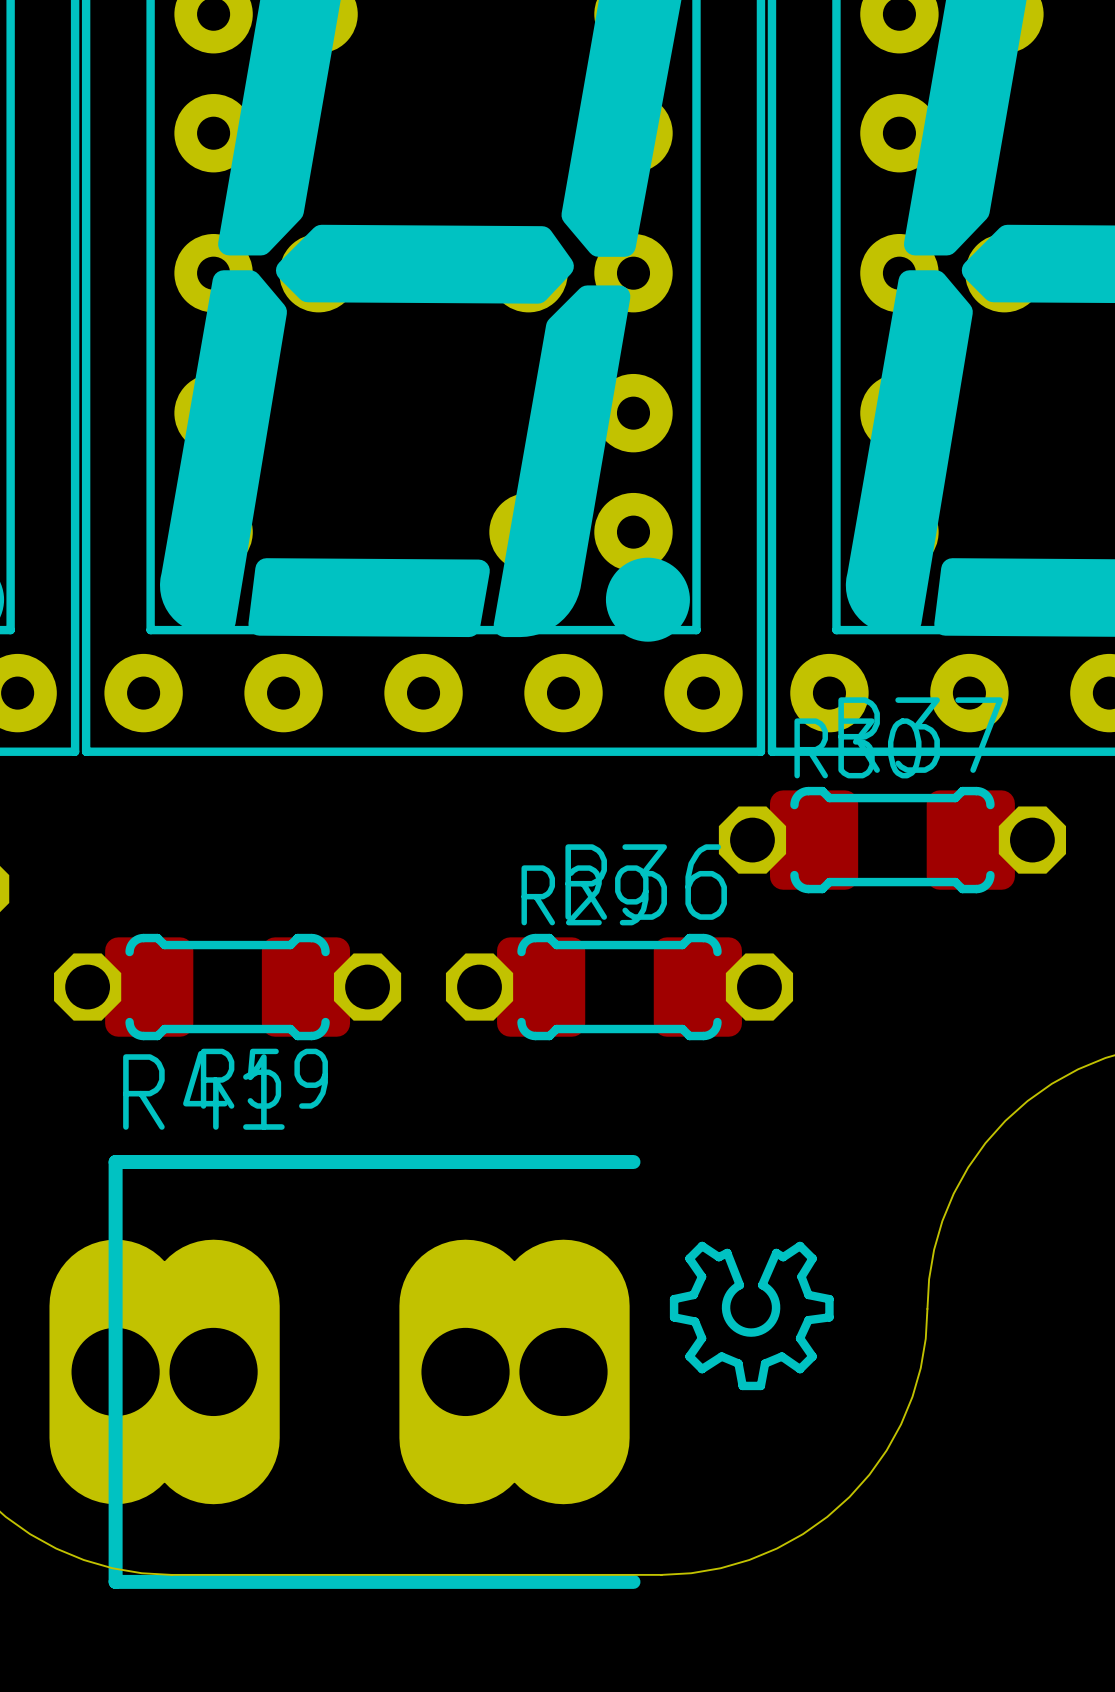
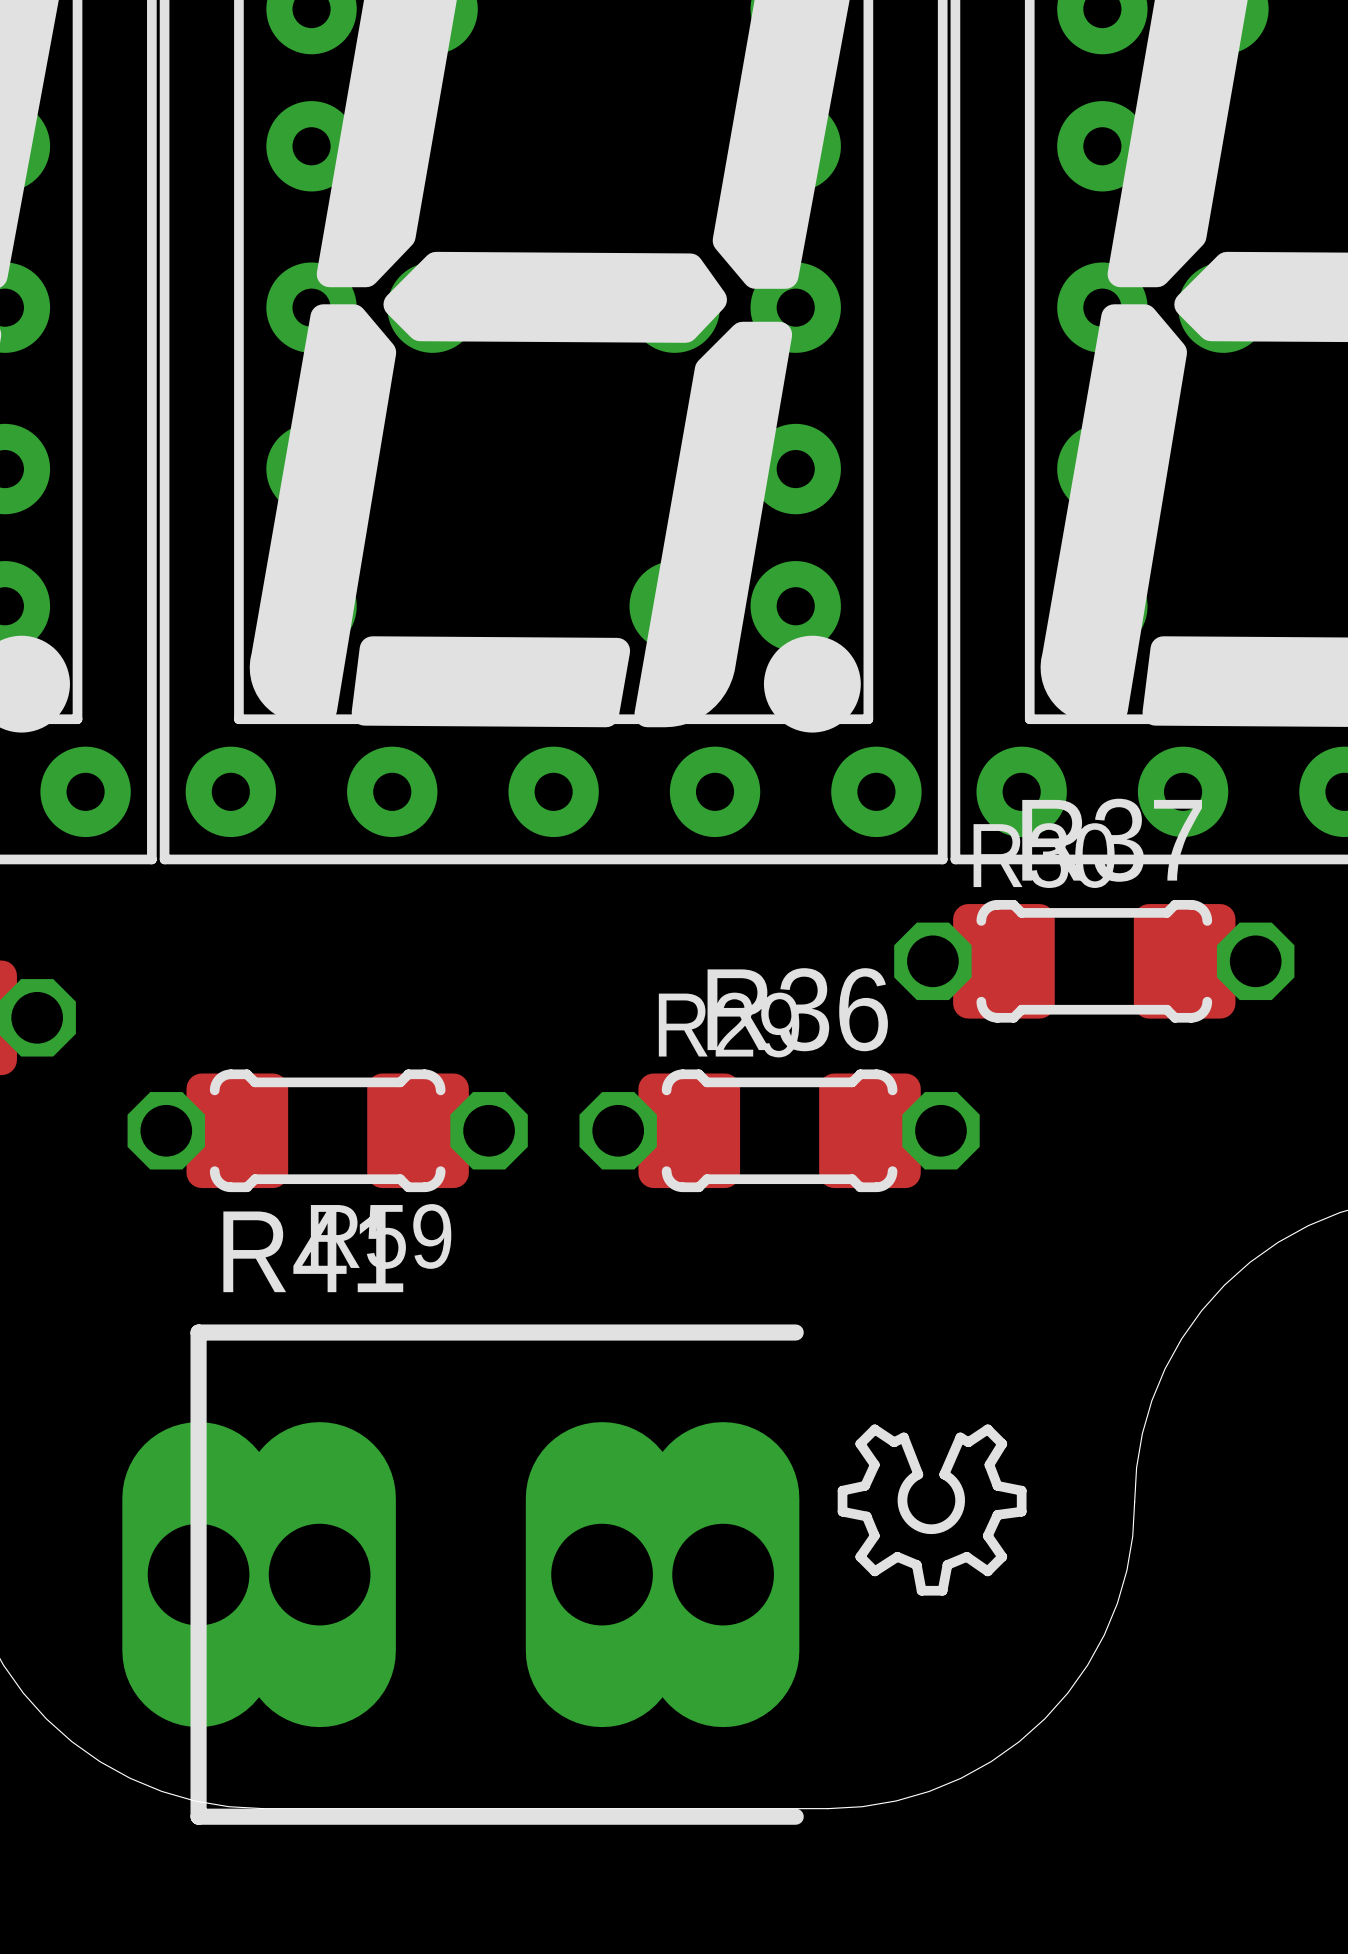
part footprint: [49, 1155, 641, 1589] -> [122, 1324, 804, 1825]

